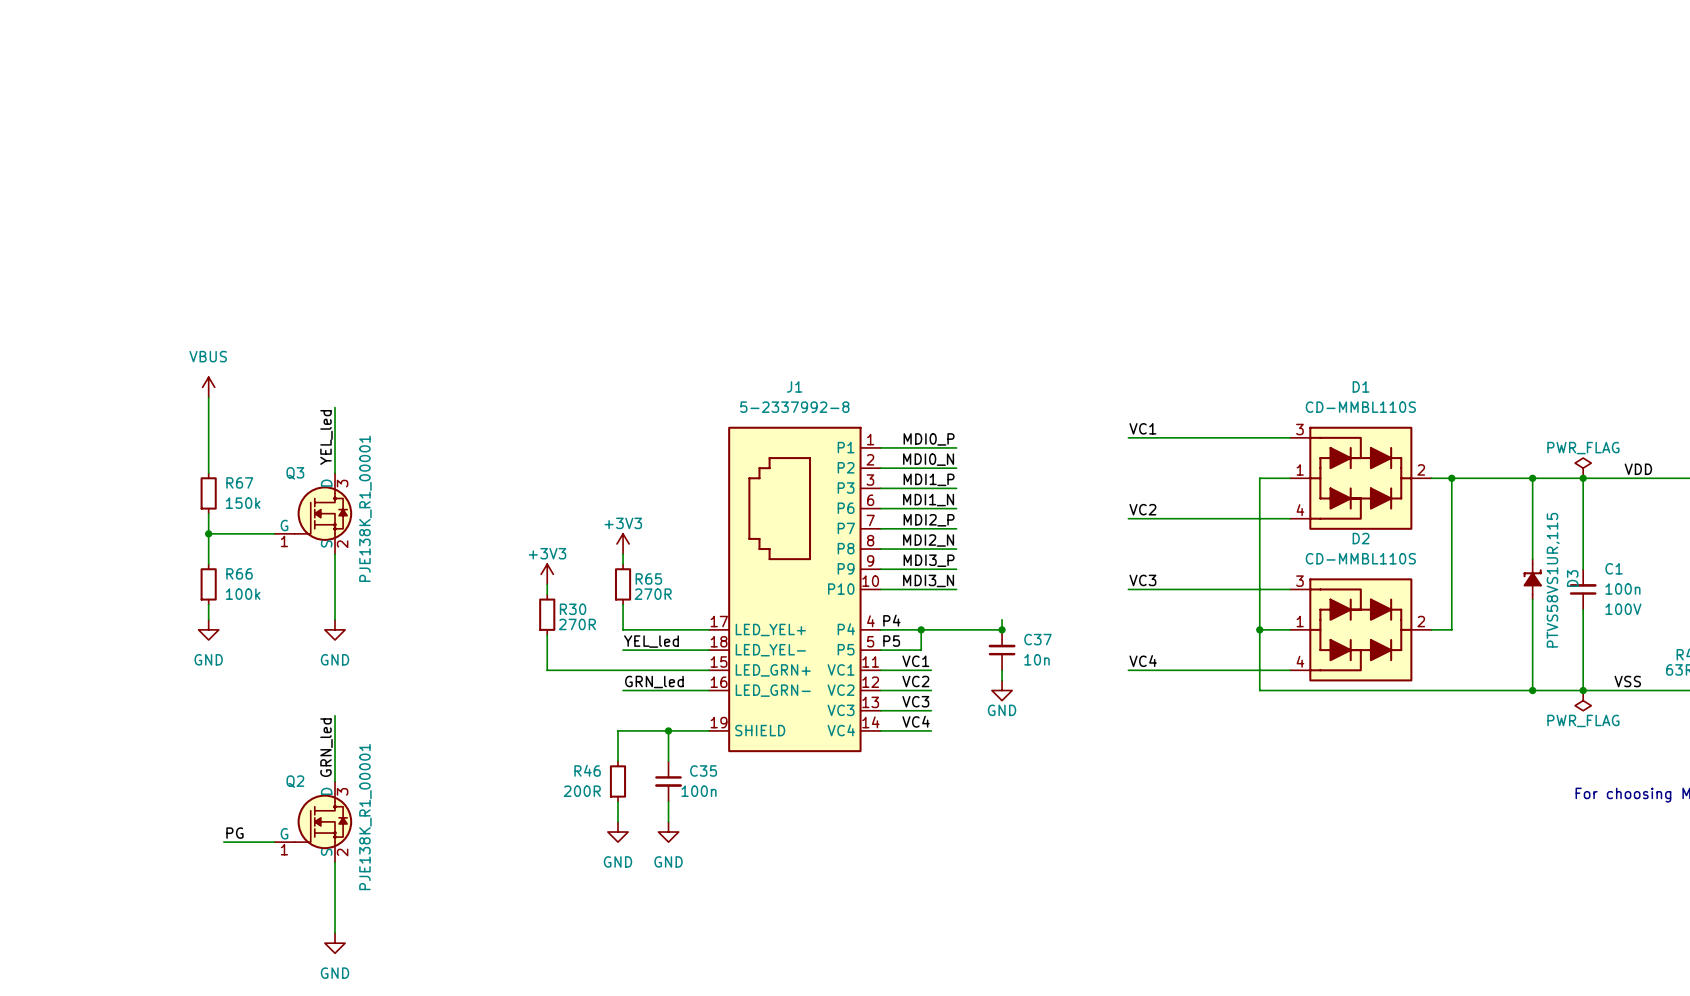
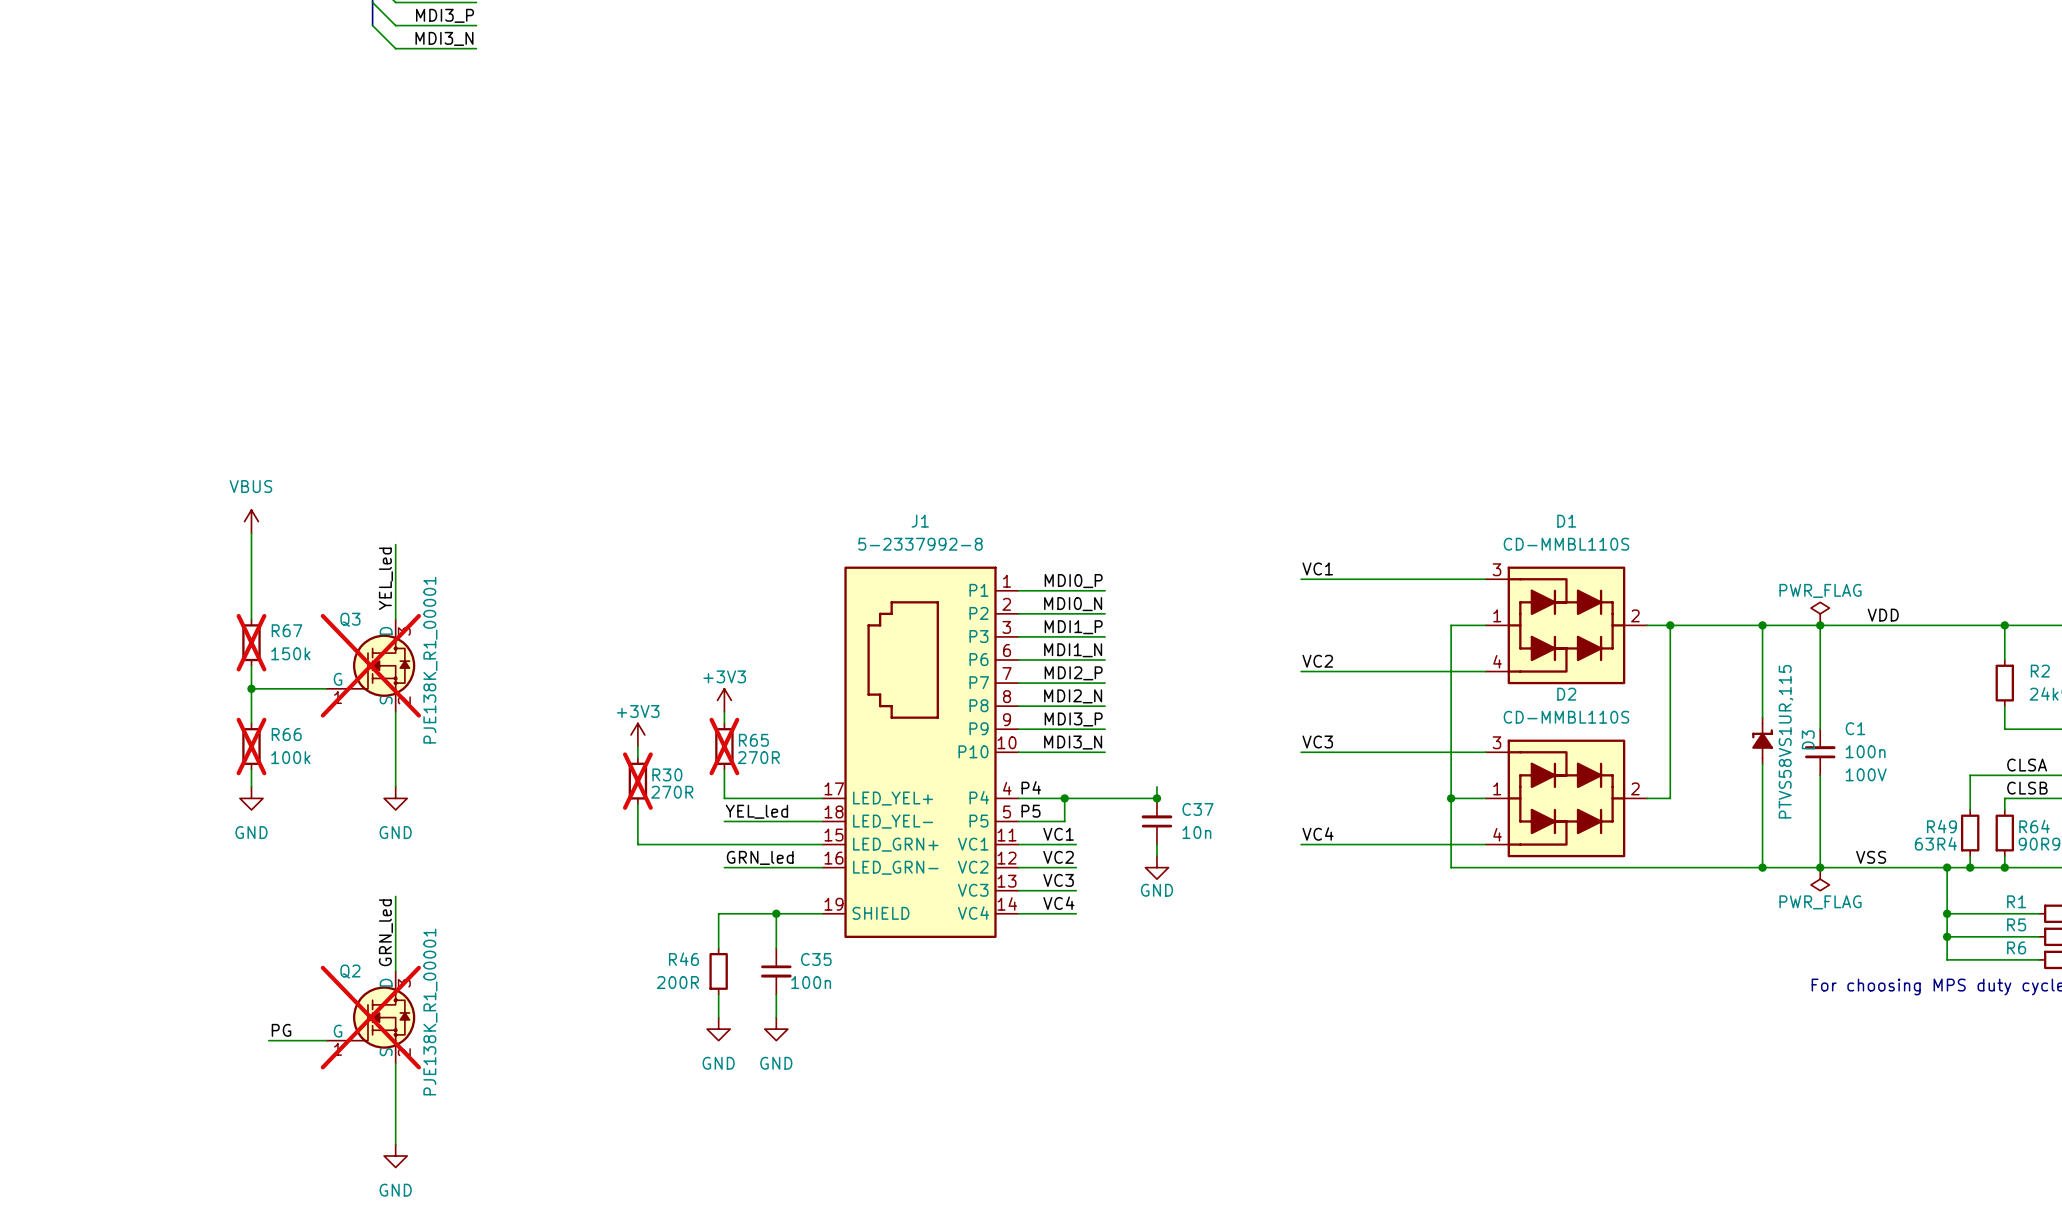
R67 do-not-place cross: none -> (251, 642)
Q3 do-not-place cross: none -> (370, 665)
R66 do-not-place cross: none -> (251, 746)
R65 do-not-place cross: none -> (724, 746)
R30 do-not-place cross: none -> (637, 781)
Q2 do-not-place cross: none -> (370, 1017)

